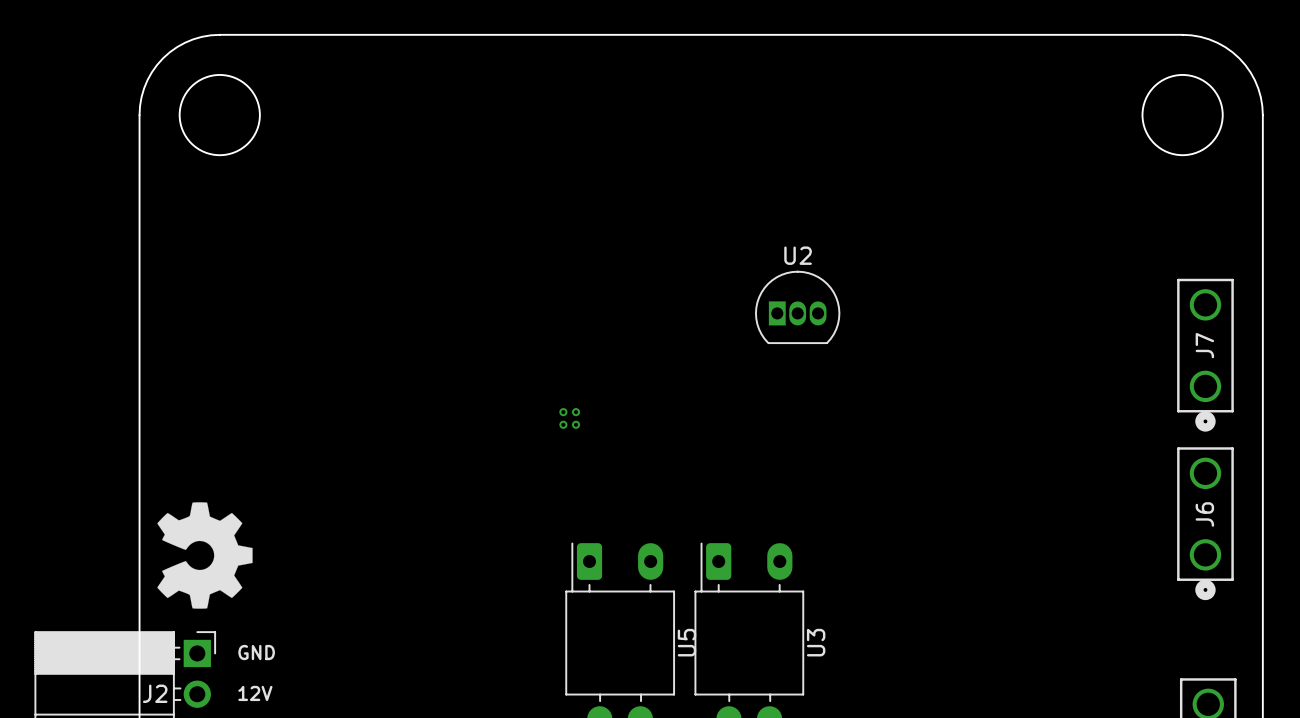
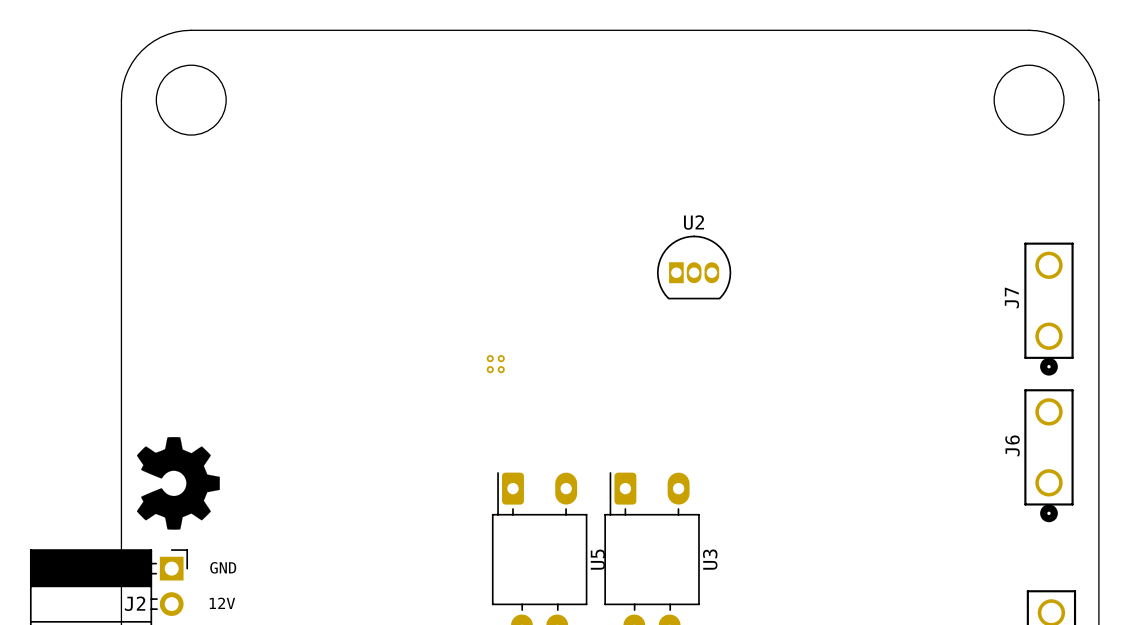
J7 name position: J7 (1204, 345) -> J7 (1011, 297)
J6 name position: J6 (1204, 514) -> J6 (1012, 445)

